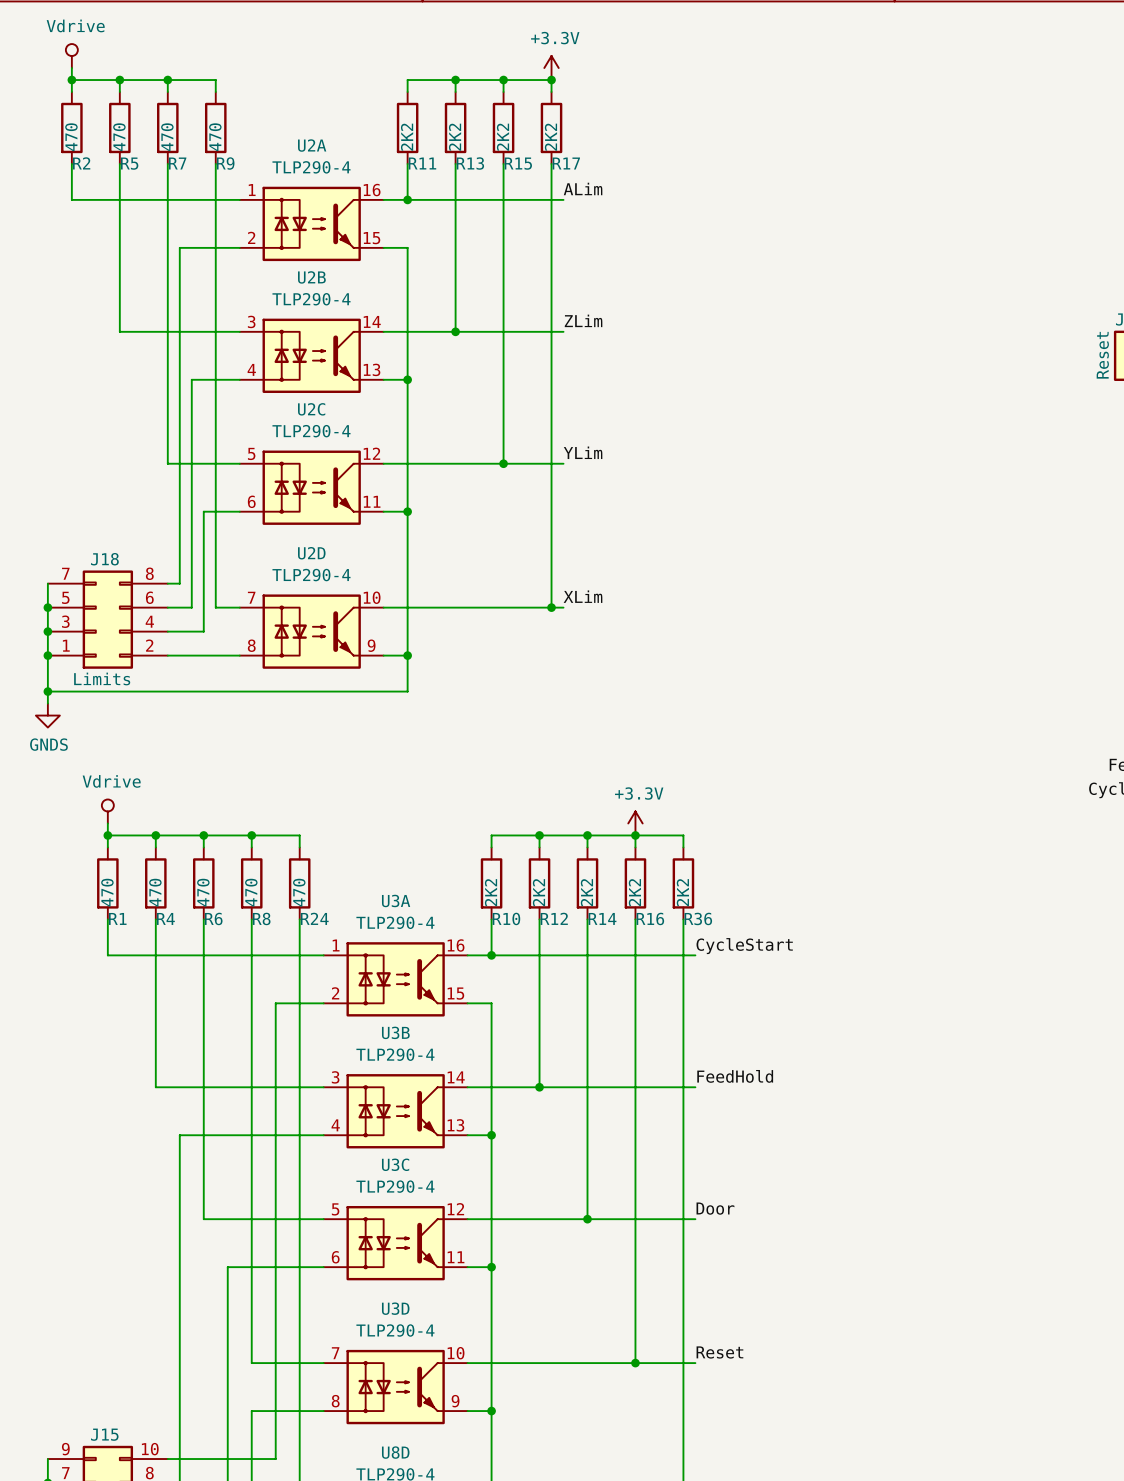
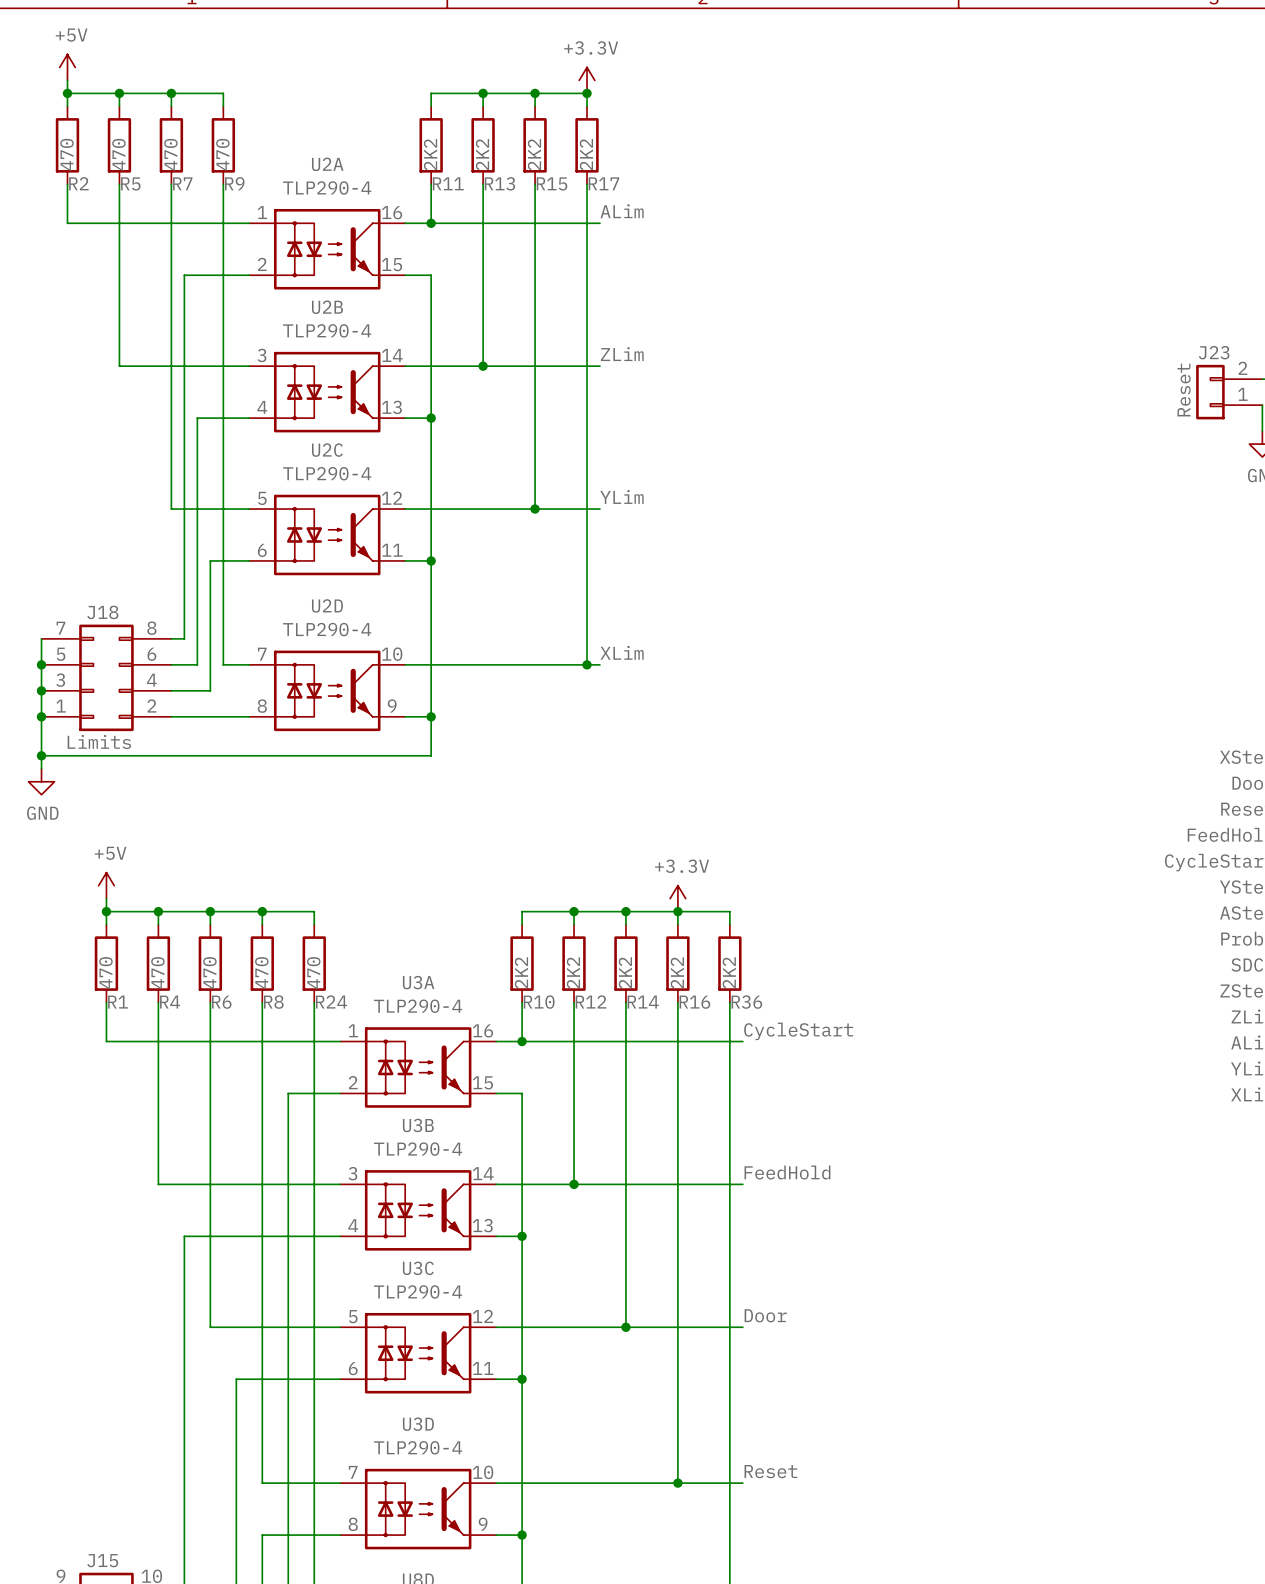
power symbol: Vdrive (71, 56) -> +5V (67, 67)
power symbol: GNDS (47, 715) -> GND (41, 781)
power symbol: Vdrive (107, 811) -> +5V (106, 885)

